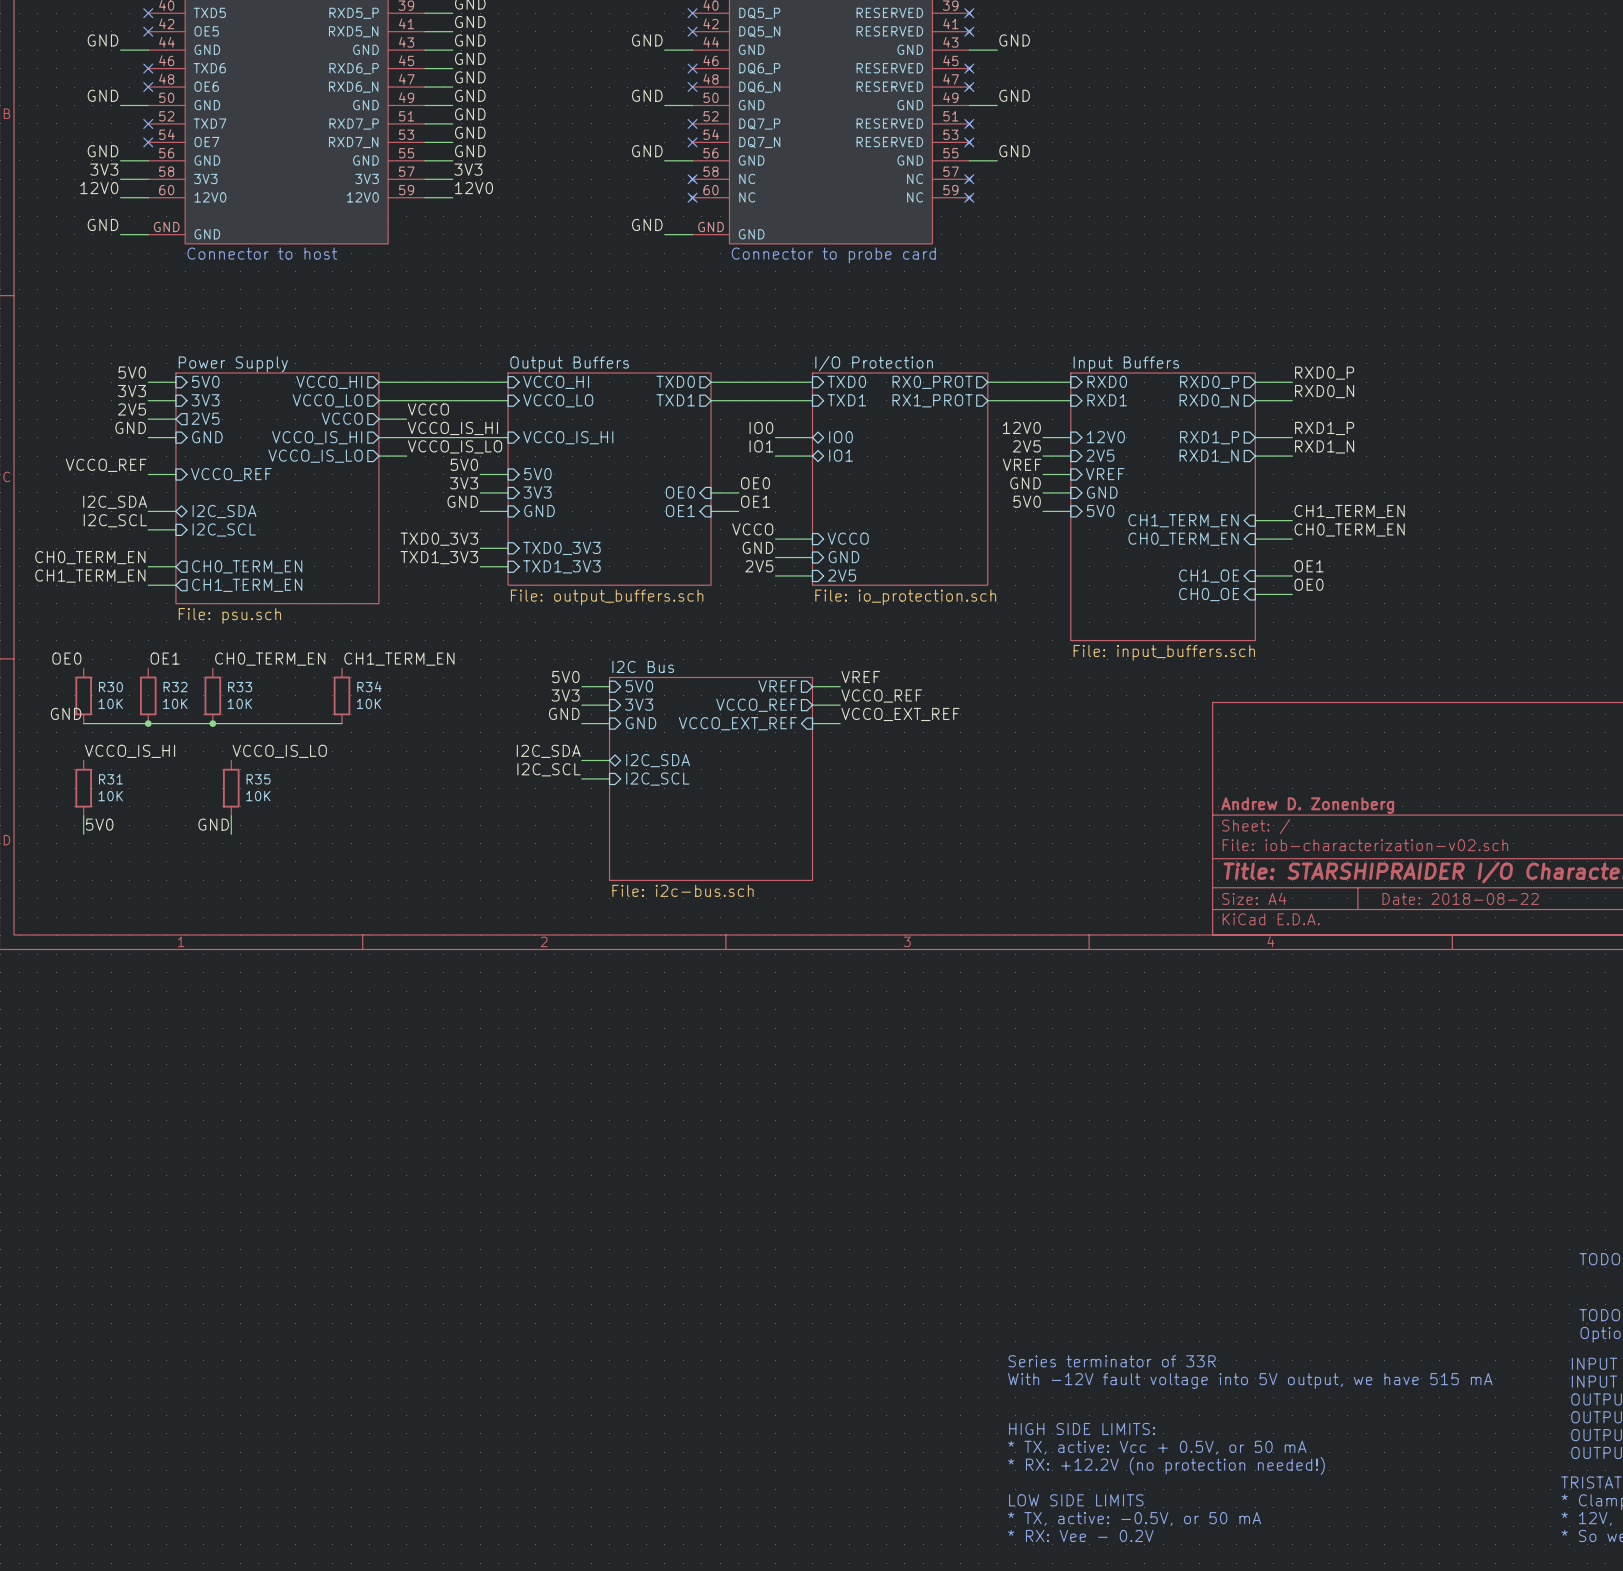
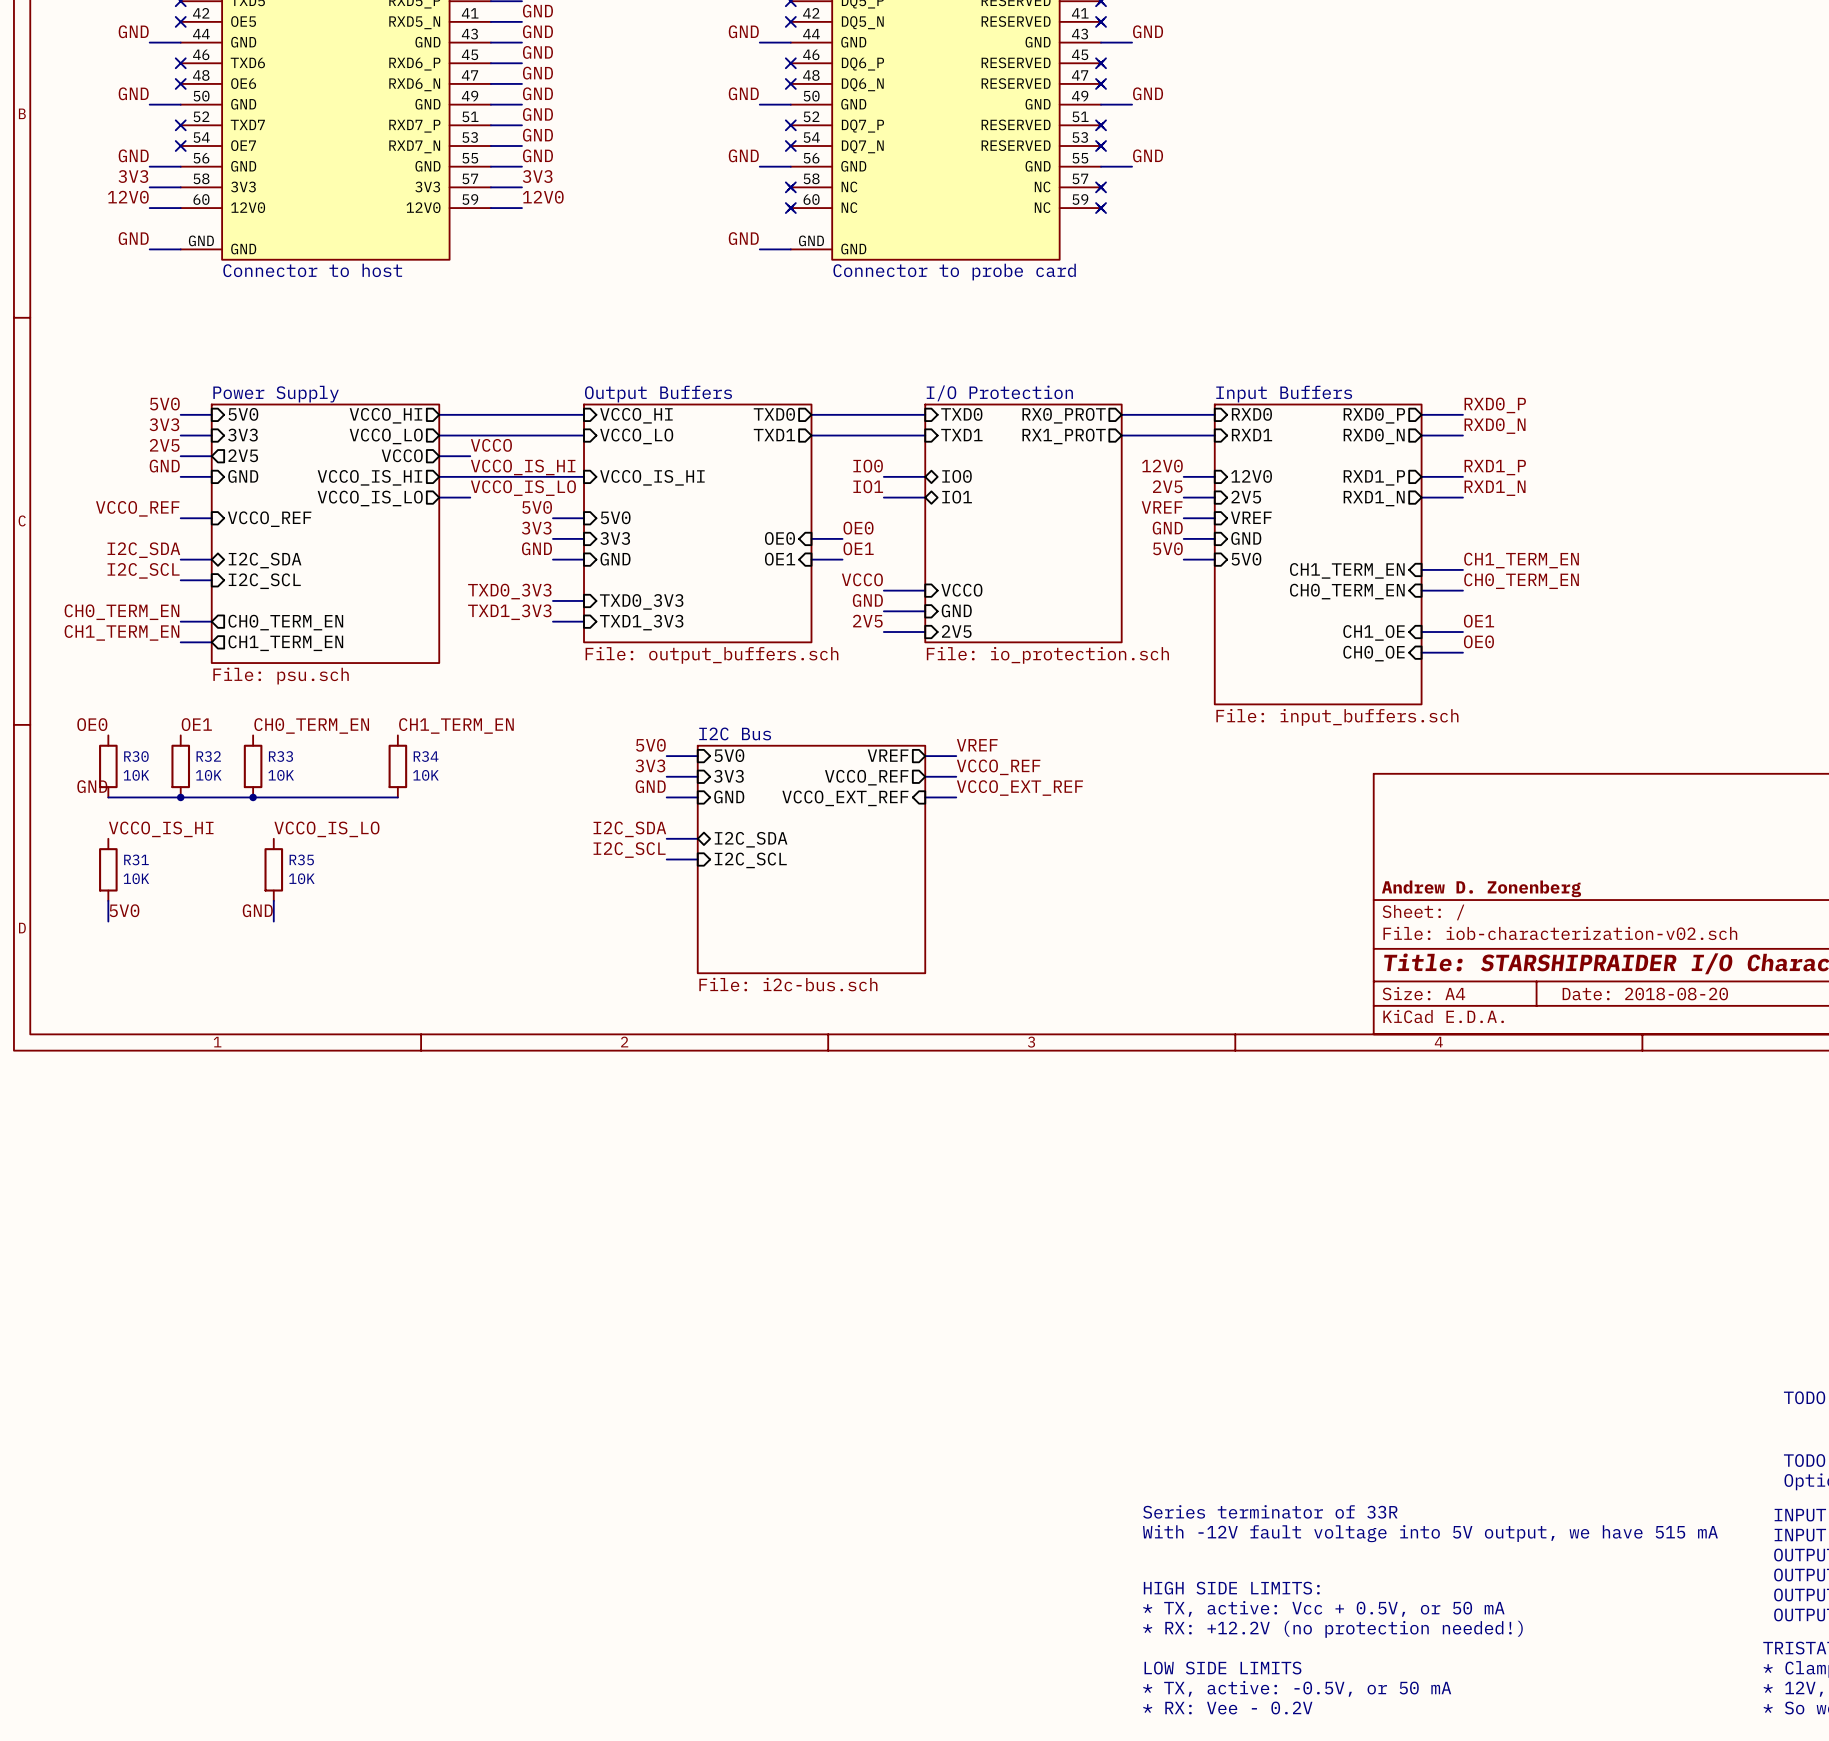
title block: Date: 2018-08-22 (1460, 898) -> Date: 2018-08-20 (1645, 994)

